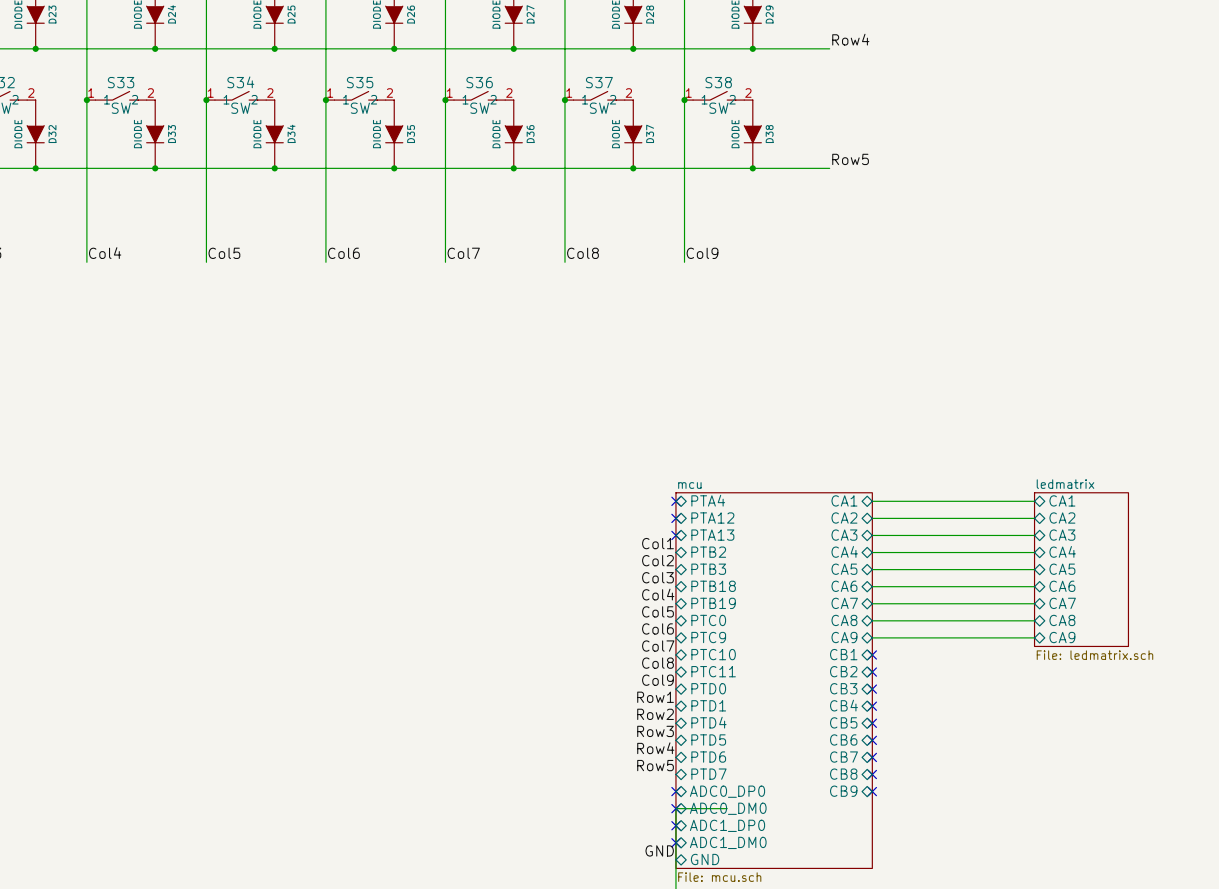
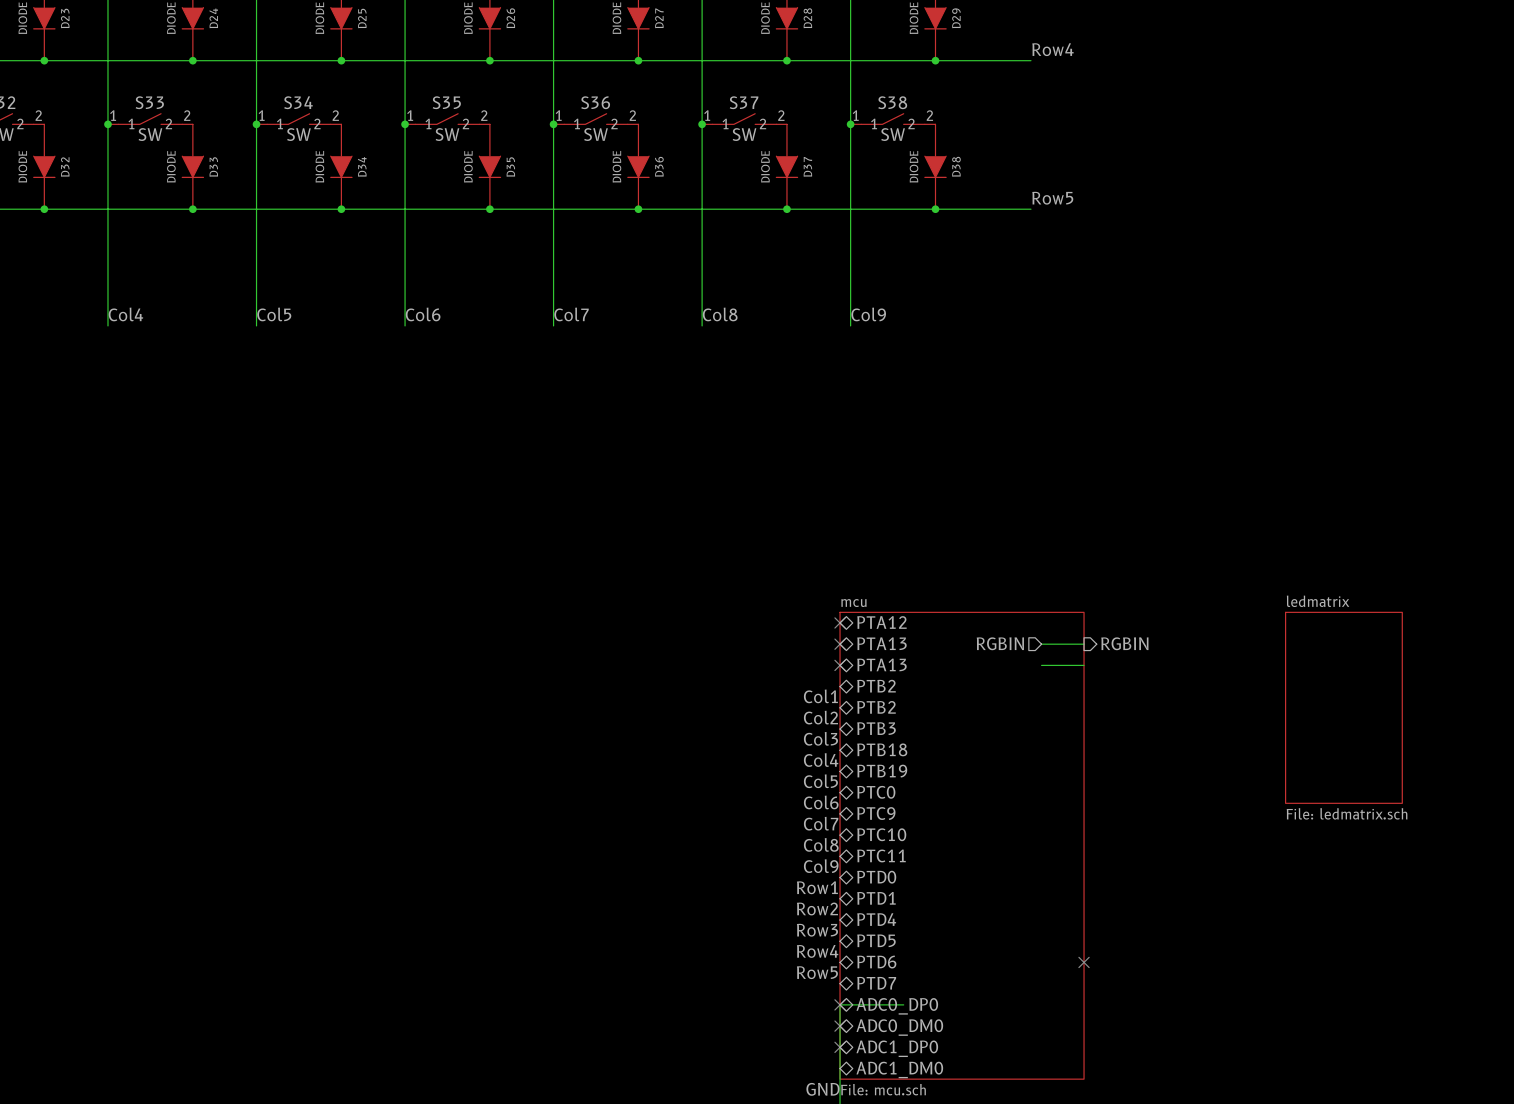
sheet pin: PTA4 (708, 500) -> PTA12 (881, 622)
sheet pin: CA1 (844, 500) -> none
sheet pin: CA1 (1062, 500) -> none
wire: (872, 501) (1034, 501) -> none
sheet pin: PTA12 (712, 518) -> PTA13 (881, 643)
sheet pin: none -> RGBIN (1000, 643)
sheet pin: CA2 (844, 518) -> none
wire: (872, 518) (1034, 518) -> (1084, 644) (1041, 644)
sheet pin: none -> RGBIN (1124, 643)
sheet pin: CA2 (1062, 518) -> none
sheet pin: CA3 (844, 535) -> none
wire: (872, 535) (1034, 535) -> (1084, 665) (1041, 665)
sheet pin: CA3 (1062, 535) -> none
label: Col1 (657, 543) -> none
sheet pin: CA4 (844, 551) -> none
sheet pin: CA4 (1062, 551) -> none
wire: (872, 552) (1034, 552) -> none
label: Col2 (657, 560) -> Col1 (820, 696)
sheet pin: PTB3 (708, 569) -> PTB2 (876, 707)
sheet pin: CA5 (844, 569) -> none
wire: (872, 569) (1034, 569) -> none
sheet pin: CA5 (1062, 569) -> none
label: Col3 (657, 577) -> Col2 (820, 717)
sheet pin: PTB18 (713, 586) -> PTB3 (876, 728)
sheet pin: CA6 (844, 586) -> none
wire: (872, 586) (1034, 586) -> none
sheet pin: CA6 (1062, 586) -> none
label: Col4 (658, 594) -> Col3 (820, 738)
sheet pin: PTB19 (713, 603) -> PTB18 (882, 749)
sheet pin: CA7 (844, 603) -> none
wire: (872, 603) (1034, 603) -> none
sheet pin: CA7 (1062, 603) -> none
label: Col5 (657, 611) -> Col4 (821, 760)
sheet pin: PTC0 (708, 620) -> PTB19 (882, 771)
sheet pin: CA8 (844, 620) -> none
wire: (872, 620) (1034, 620) -> none
sheet pin: CA8 (1062, 620) -> none
label: Col6 (657, 628) -> Col5 (820, 781)
sheet pin: PTC9 (708, 637) -> PTC0 (876, 792)
sheet pin: CA9 (844, 637) -> none
wire: (872, 637) (1034, 637) -> none
sheet pin: CA9 (1062, 637) -> none
label: Col7 (658, 646) -> Col6 (821, 802)
sheet pin: PTC10 (713, 654) -> PTC9 (876, 813)
sheet pin: CB1 (843, 654) -> none
no-connect mark: (872, 654) -> none
label: Col8 (657, 663) -> Col7 (821, 823)
sheet pin: PTC11 (713, 671) -> PTC10 (881, 834)
sheet pin: CB2 (843, 671) -> none
no-connect mark: (872, 672) -> none
label: Col9 (657, 680) -> Col8 (821, 844)
sheet pin: PTD0 (708, 688) -> PTC11 (881, 855)
sheet pin: CB3 (843, 688) -> none
no-connect mark: (872, 689) -> none
label: Row1 (655, 697) -> Col9 (821, 866)
sheet pin: PTD1 (708, 705) -> PTD0 (876, 877)
sheet pin: CB4 (843, 705) -> none
no-connect mark: (872, 706) -> none
label: Row2 (655, 714) -> Row1 (817, 887)
sheet pin: PTD4 (708, 722) -> PTD1 (876, 898)
sheet pin: CB5 (843, 722) -> none
no-connect mark: (872, 723) -> none
label: Row3 (655, 731) -> Row2 (817, 908)
sheet pin: PTD5 (708, 739) -> PTD4 (876, 919)
sheet pin: CB6 (843, 739) -> none
no-connect mark: (872, 740) -> none
label: Row4 (655, 748) -> Row3 (817, 930)
sheet pin: PTD6 (708, 757) -> PTD5 (876, 940)
sheet pin: CB7 (843, 757) -> none
no-connect mark: (872, 757) -> none
label: Row5 (655, 765) -> Row4 (817, 951)
sheet pin: PTD7 (708, 774) -> PTD6 (876, 962)
sheet pin: CB8 (843, 774) -> none
label: none -> Row5 (817, 972)
no-connect mark: (675, 791) -> none
sheet pin: ADC0_DP0 (727, 791) -> PTD7 (876, 983)
sheet pin: CB9 (843, 791) -> none
no-connect mark: (872, 791) -> none
sheet pin: ADC0_DM0 (728, 808) -> ADC0_DP0 (897, 1006)
sheet pin: ADC1_DP0 (727, 825) -> ADC0_DM0 (899, 1027)
sheet pin: ADC1_DM0 (728, 842) -> ADC1_DP0 (897, 1048)
label position: GND (659, 850) -> GND (822, 1089)
sheet pin: GND (705, 859) -> ADC1_DM0 (899, 1069)

